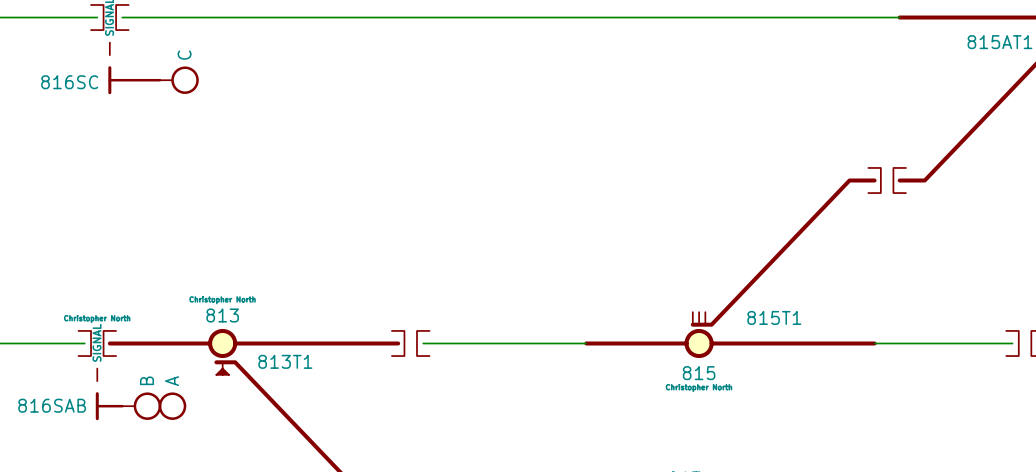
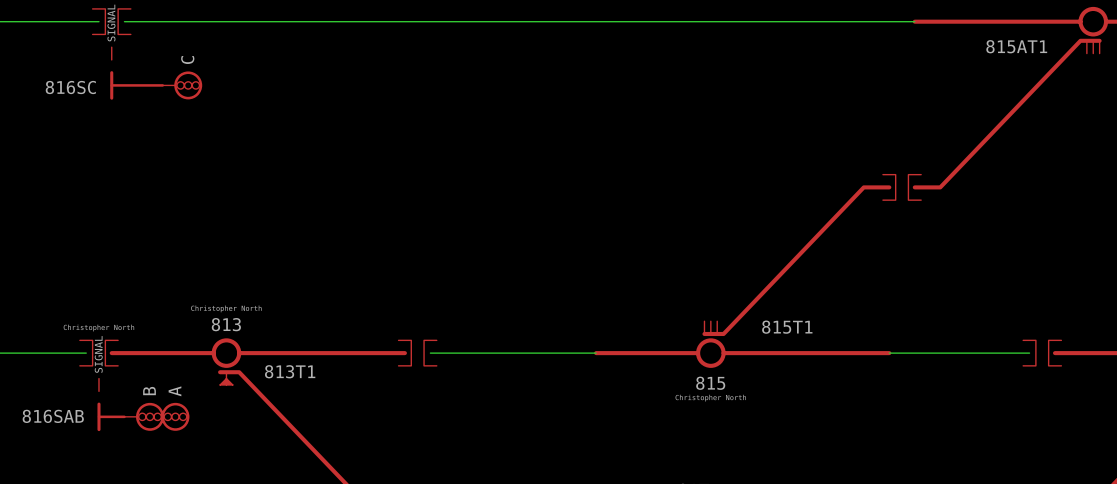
part symbol: [171, 66, 199, 94] -> [174, 71, 203, 100]
part symbol: [133, 392, 162, 420] -> [136, 402, 164, 431]
part symbol: [158, 392, 187, 420] -> [161, 402, 190, 431]

